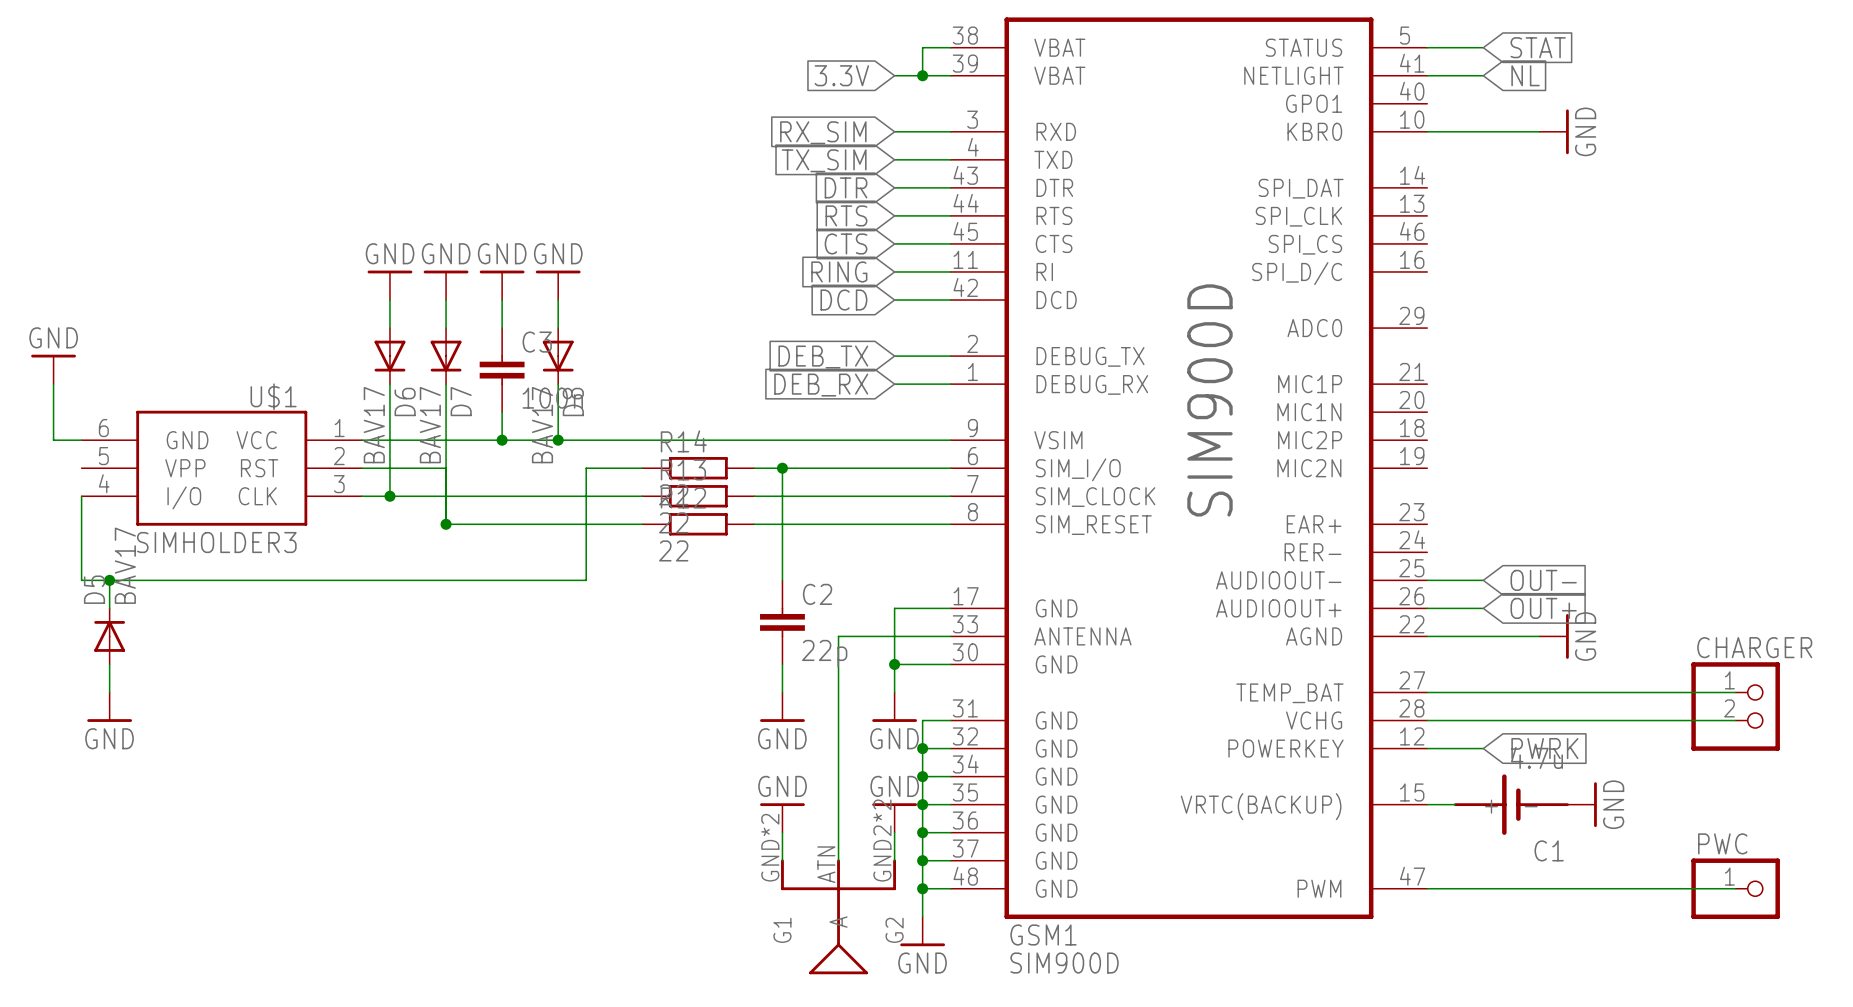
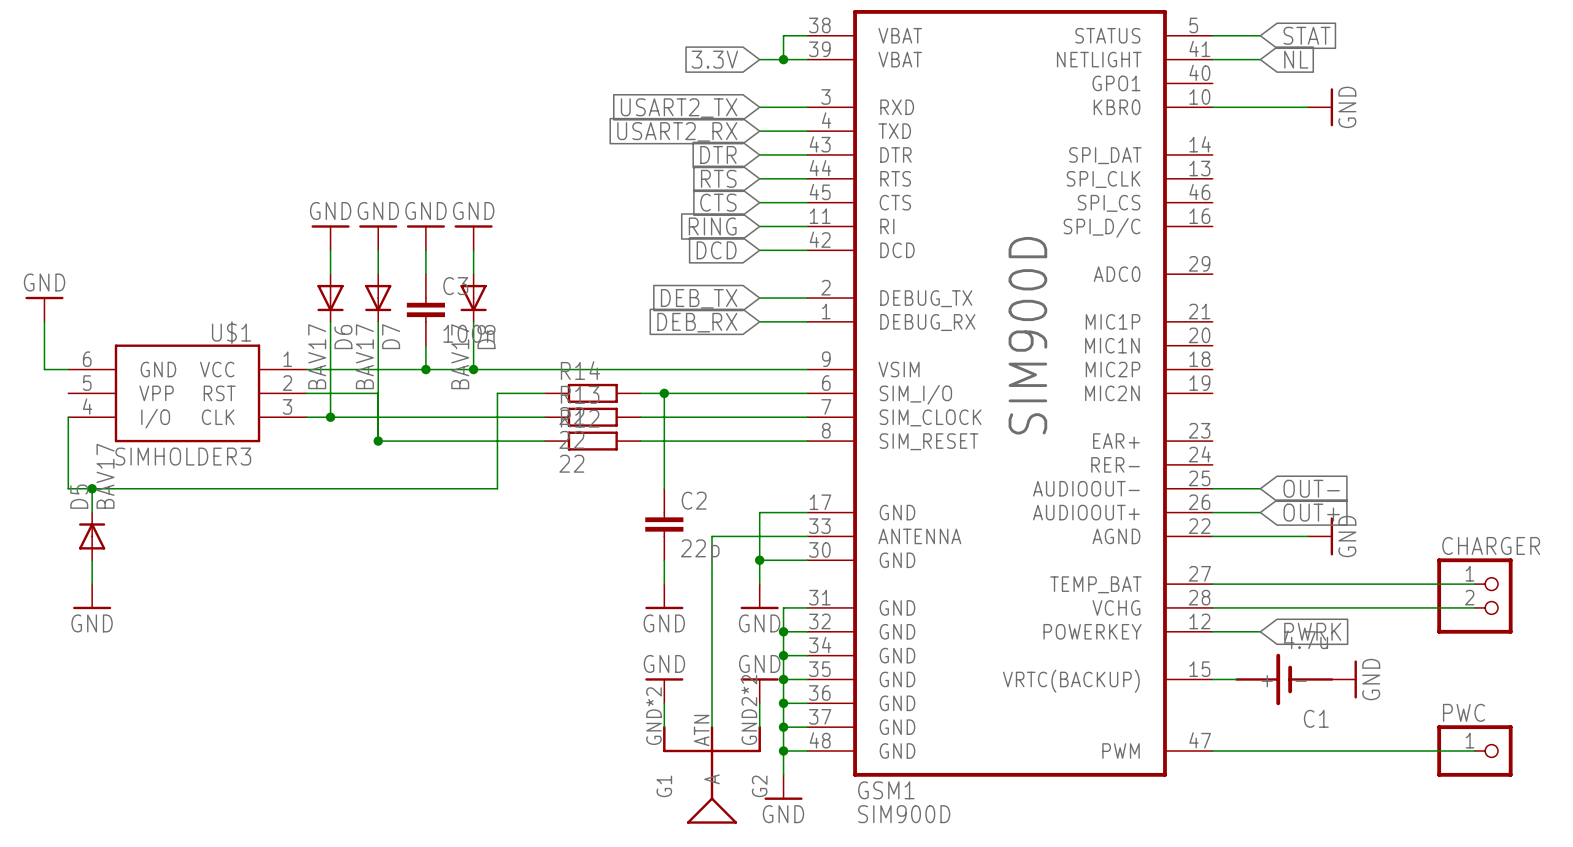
global label: RX_SIM (823, 132) -> USART2_TX (679, 108)
global label: TX_SIM (824, 160) -> USART2_RX (677, 131)

